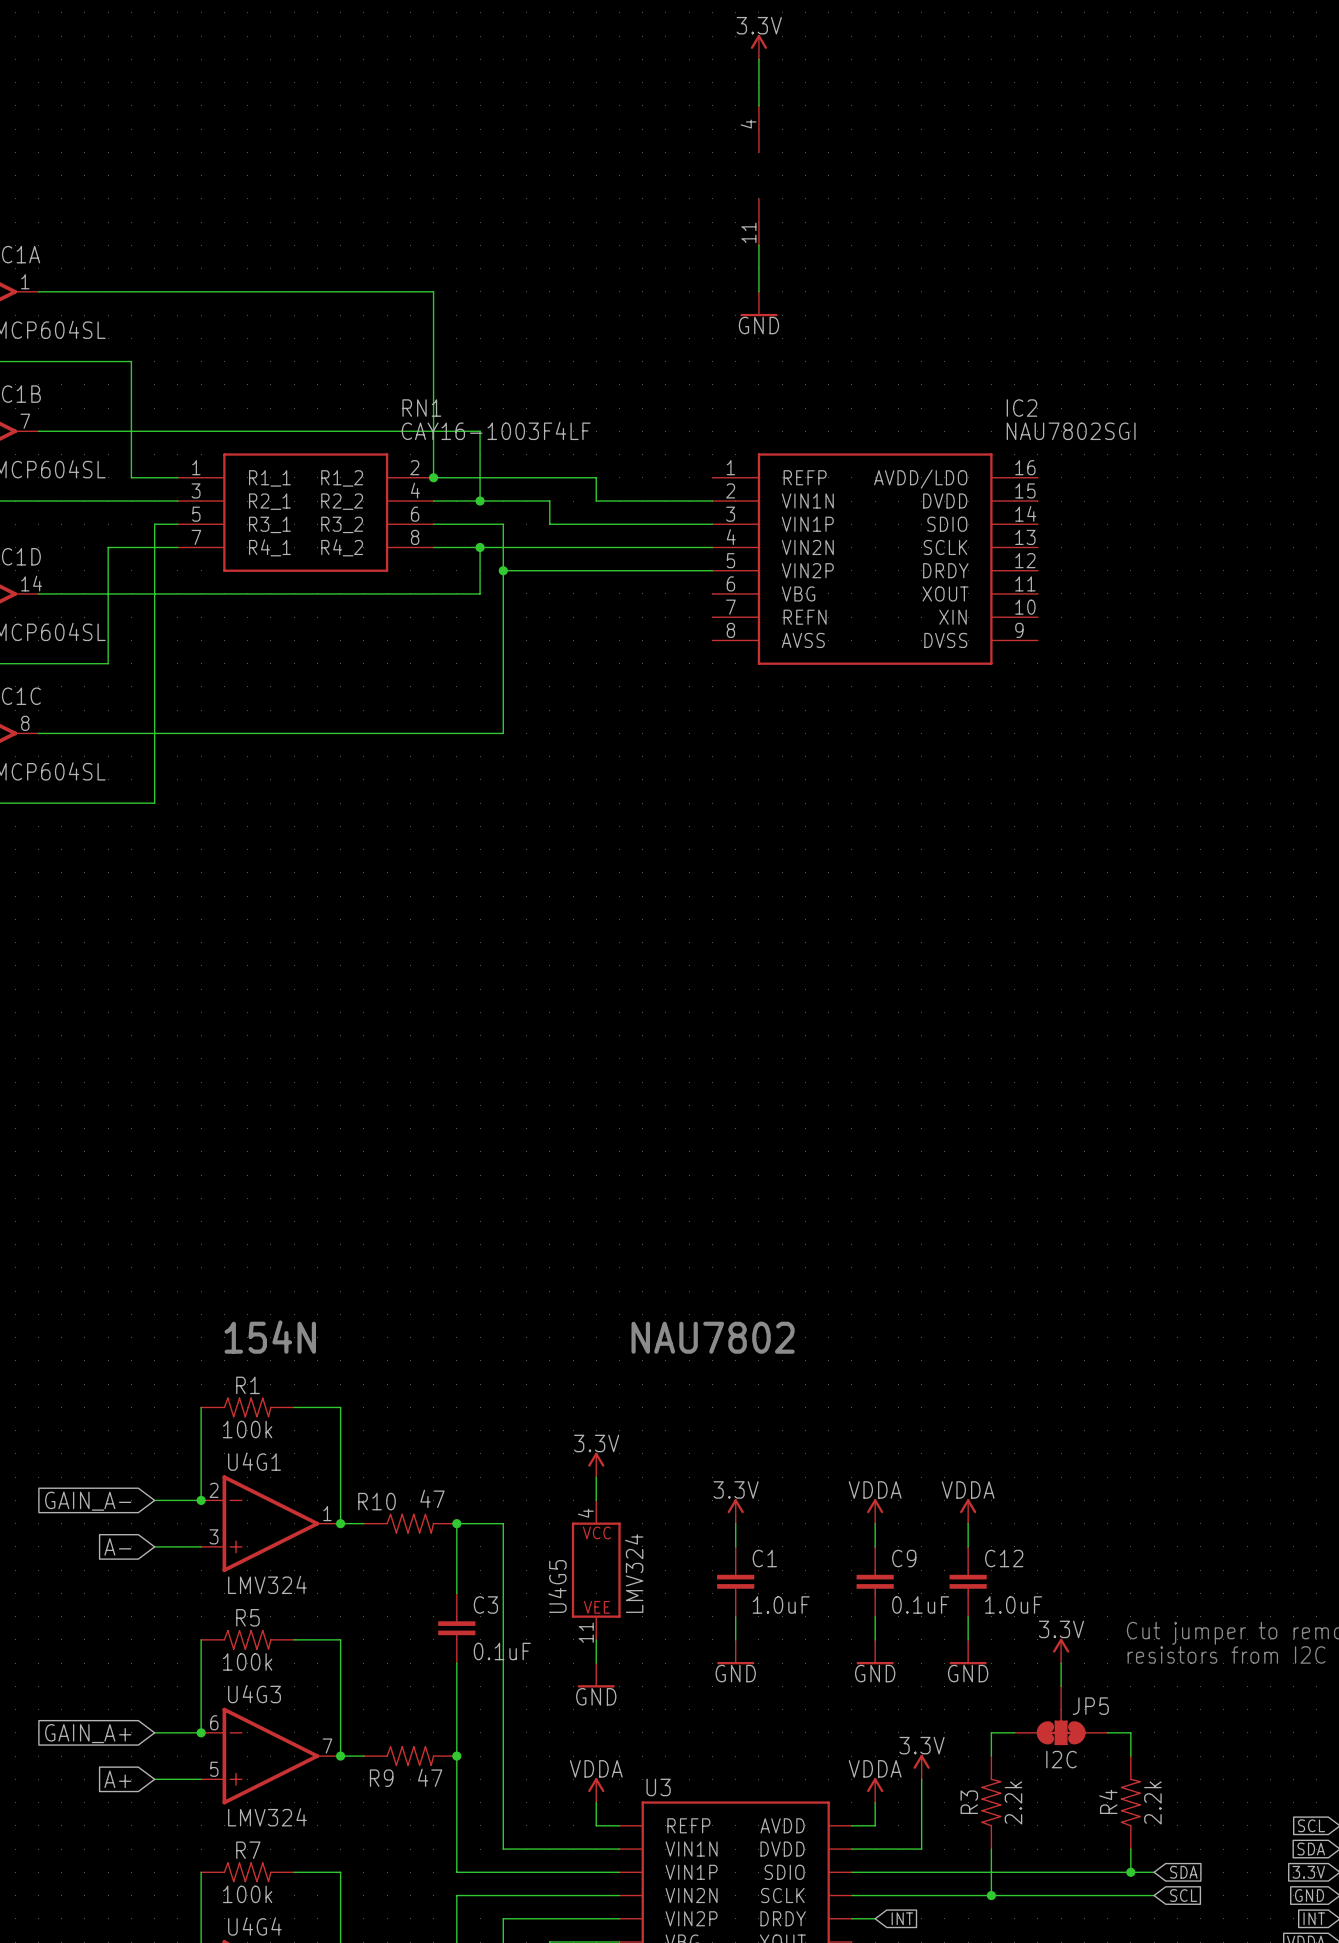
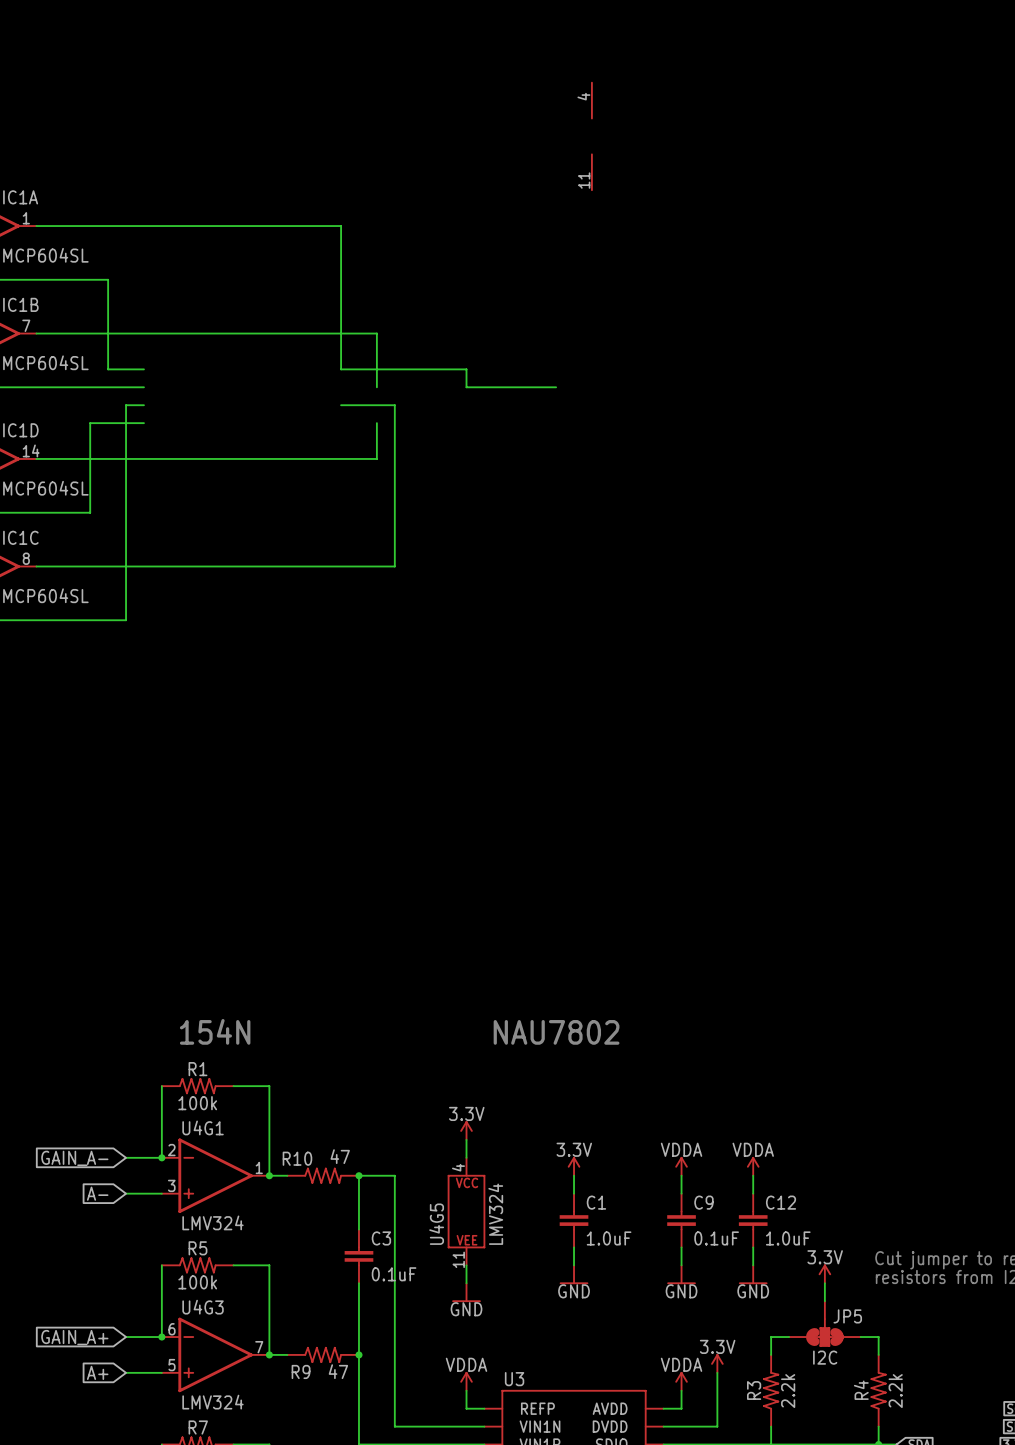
power symbol: 3.3V (758, 47) -> none
wire: (758, 59) (758, 105) -> none
wire: (758, 245) (758, 291) -> none
power symbol: GND (758, 304) -> none
junction: (433, 477) -> none
wire: (433, 501) (549, 501) (549, 524) (712, 524) -> none
junction: (480, 501) -> none
RN1: CAY16-1003F4LF (305, 512) -> none
wire: (433, 547) (712, 547) -> none
junction: (480, 547) -> none
IC2: NAU7802SGI (875, 559) -> none
wire: (503, 570) (712, 570) -> none
junction: (503, 570) -> none

